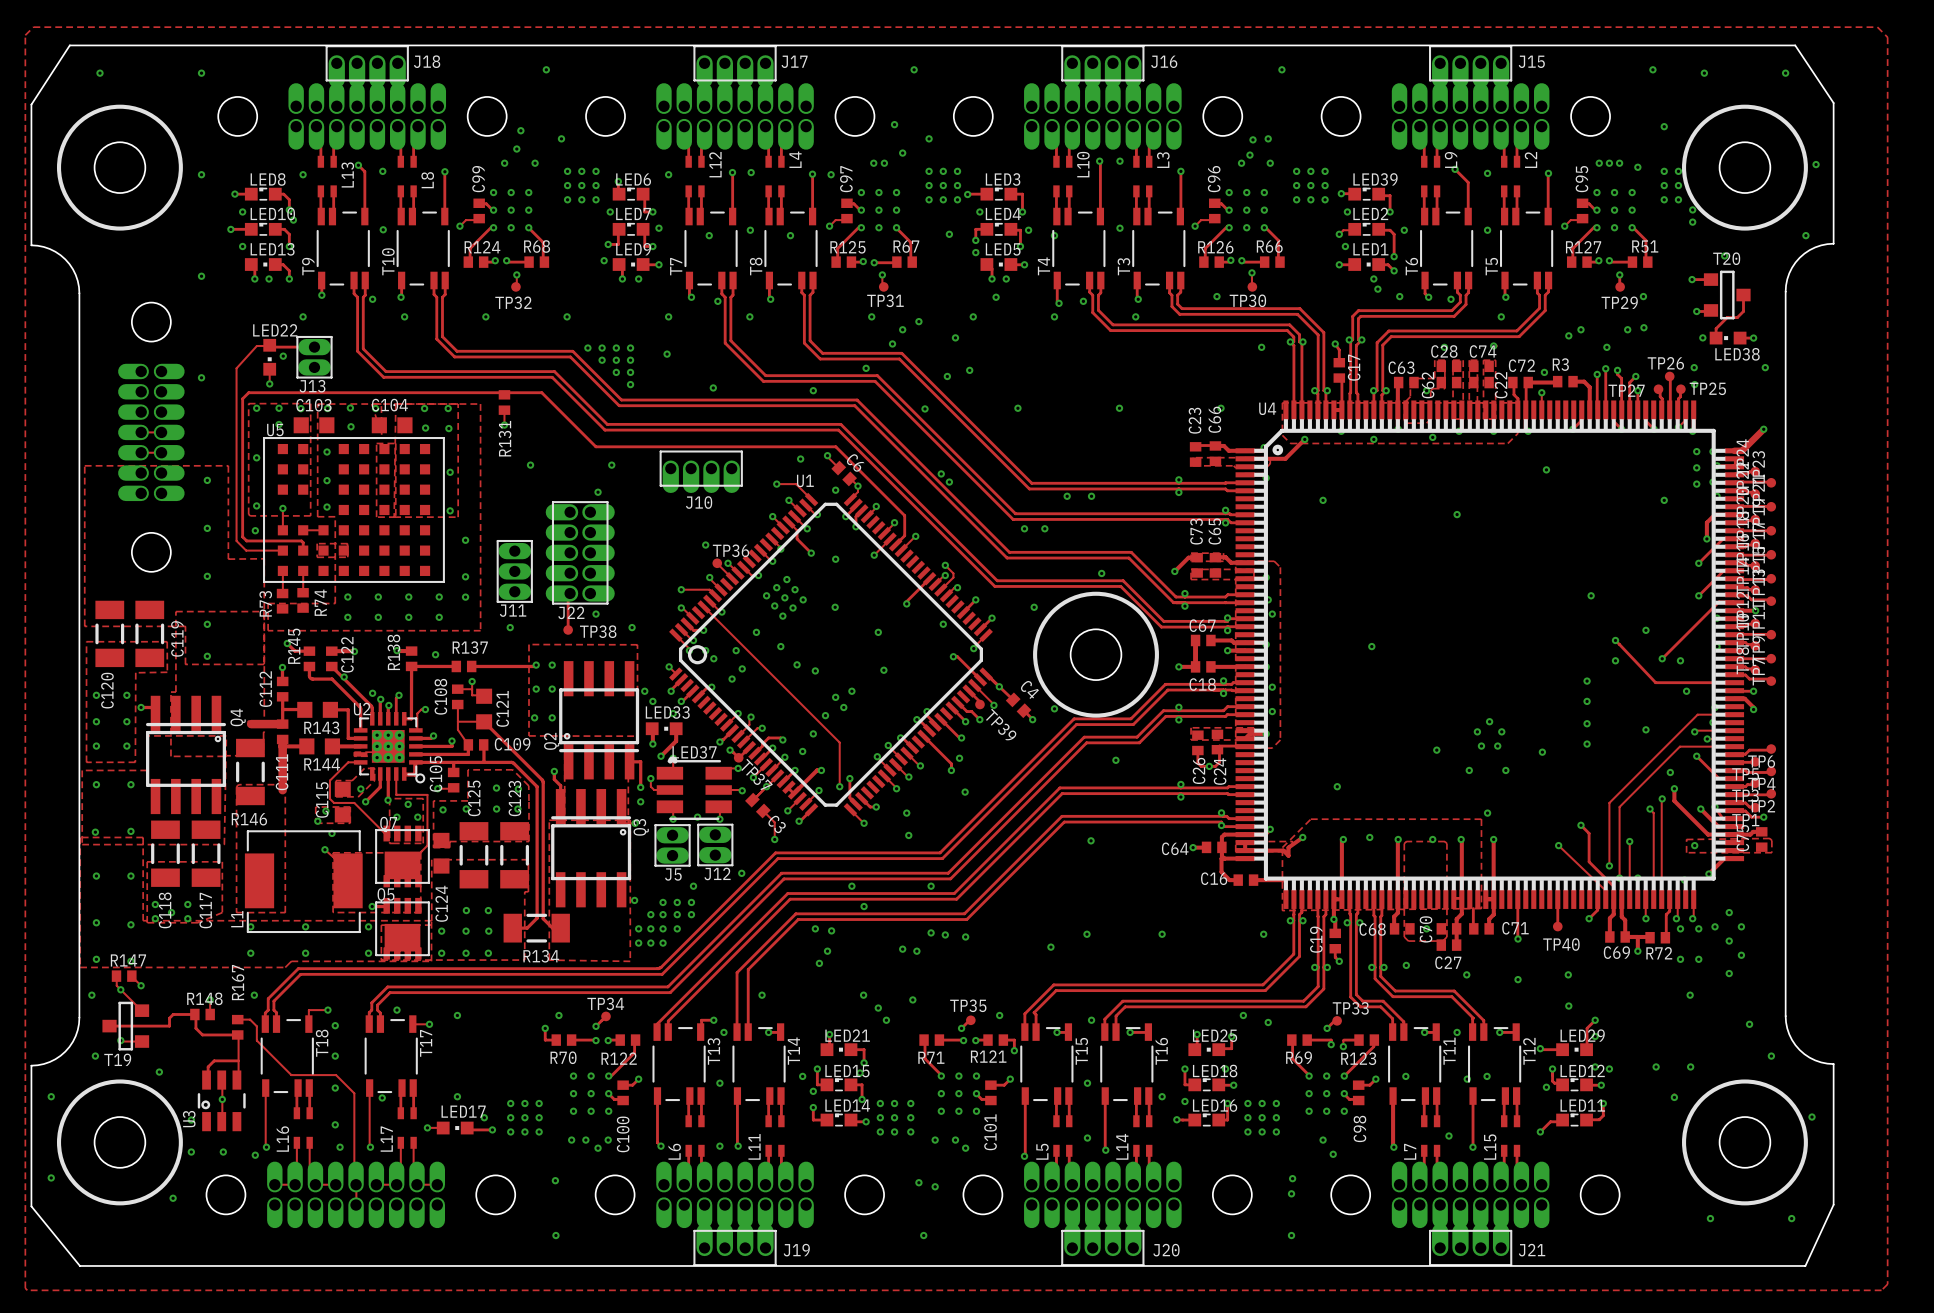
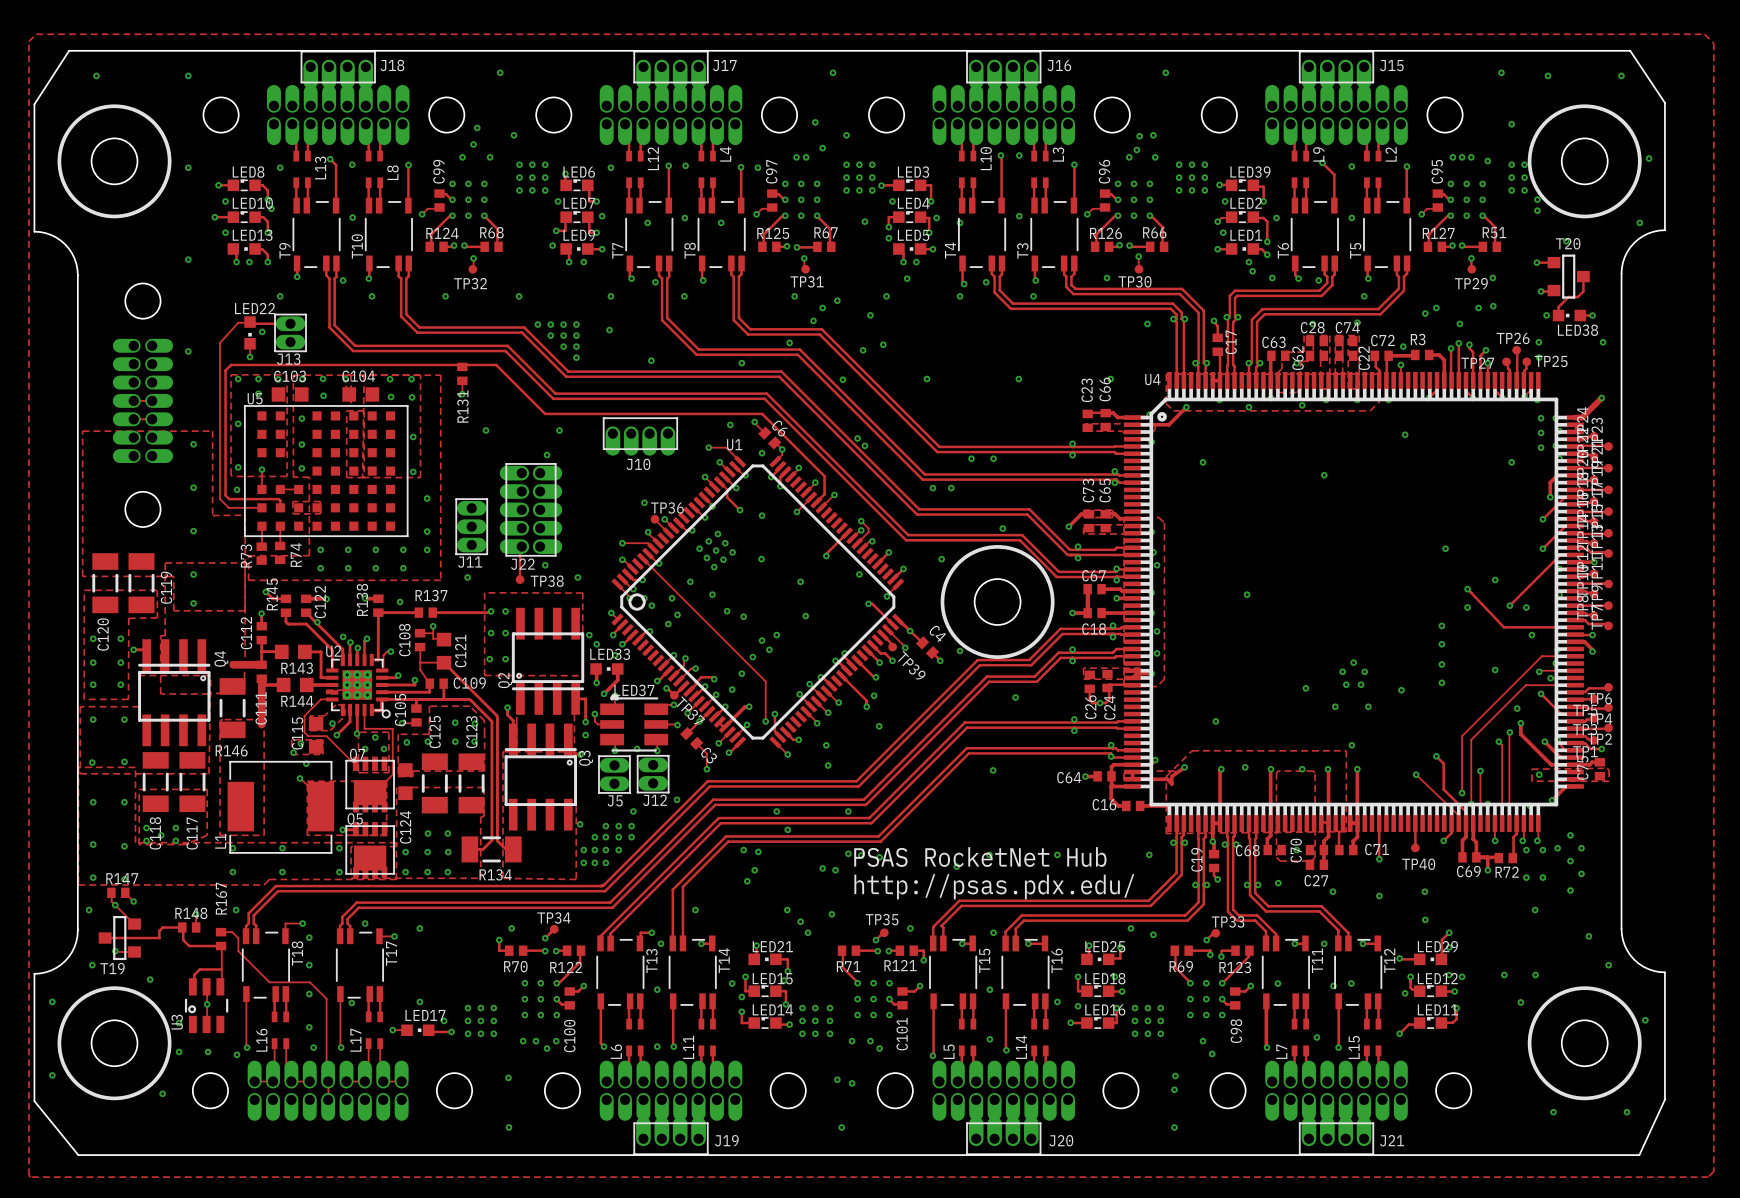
text: none -> PSAS RocketNet Hub (980, 857)
text: none -> http://psas.pdx.edu/ (994, 886)

